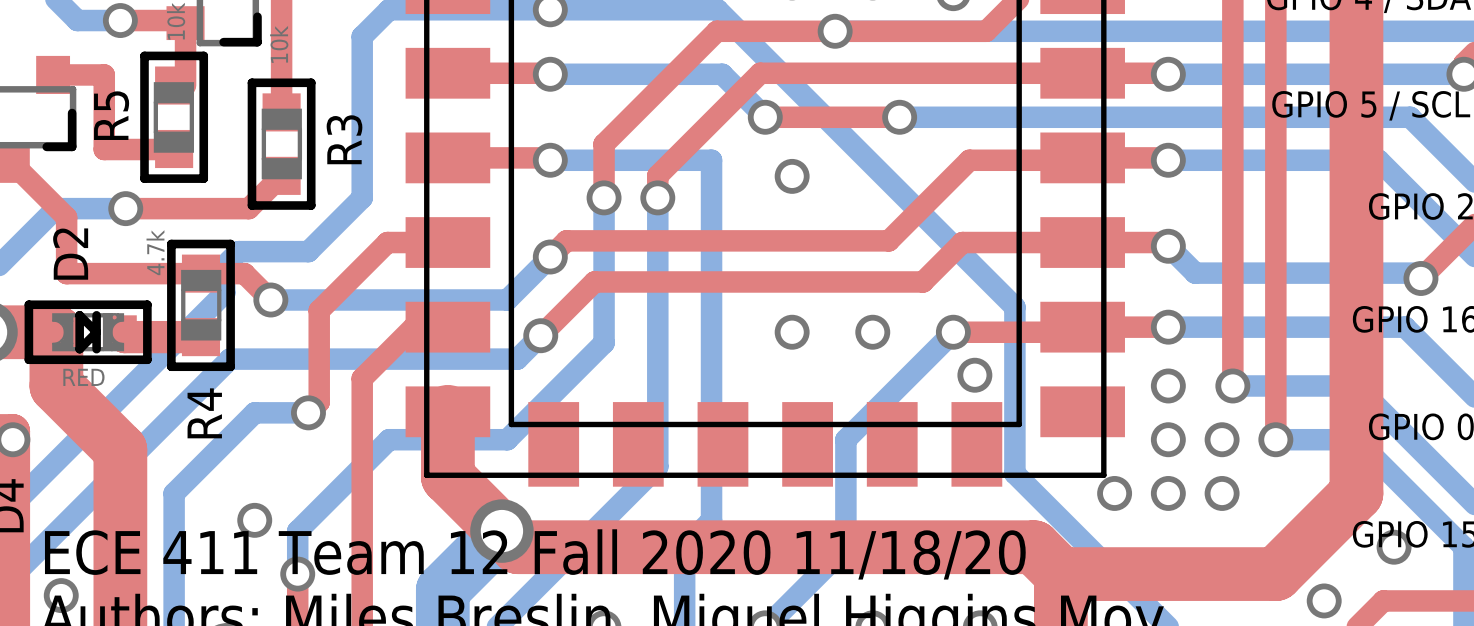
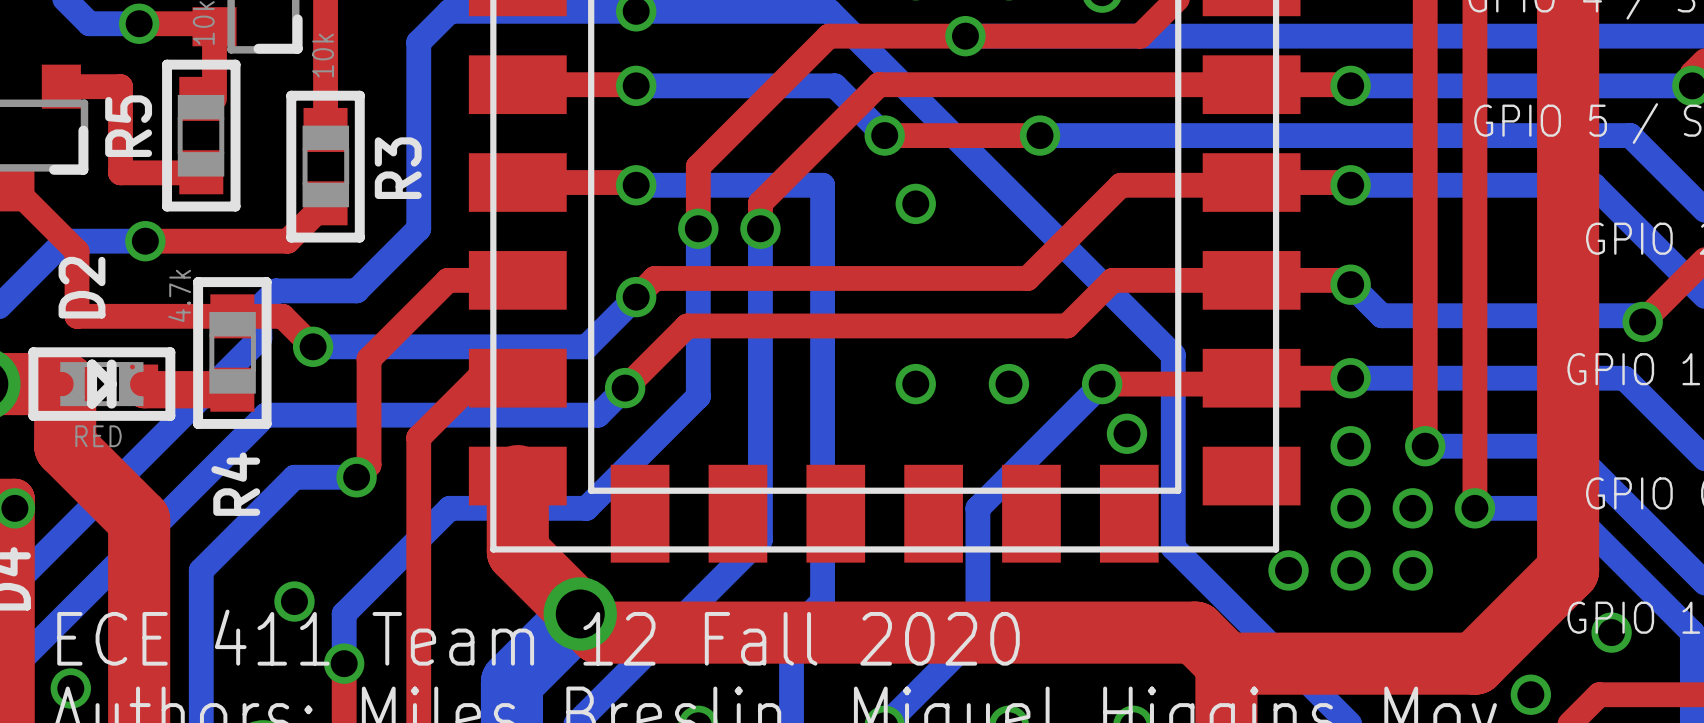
text: ECE 411 Team 12 Fall 2020 11/18/20 (535, 554) -> ECE 411 Team 12 Fall 2020 (538, 637)

